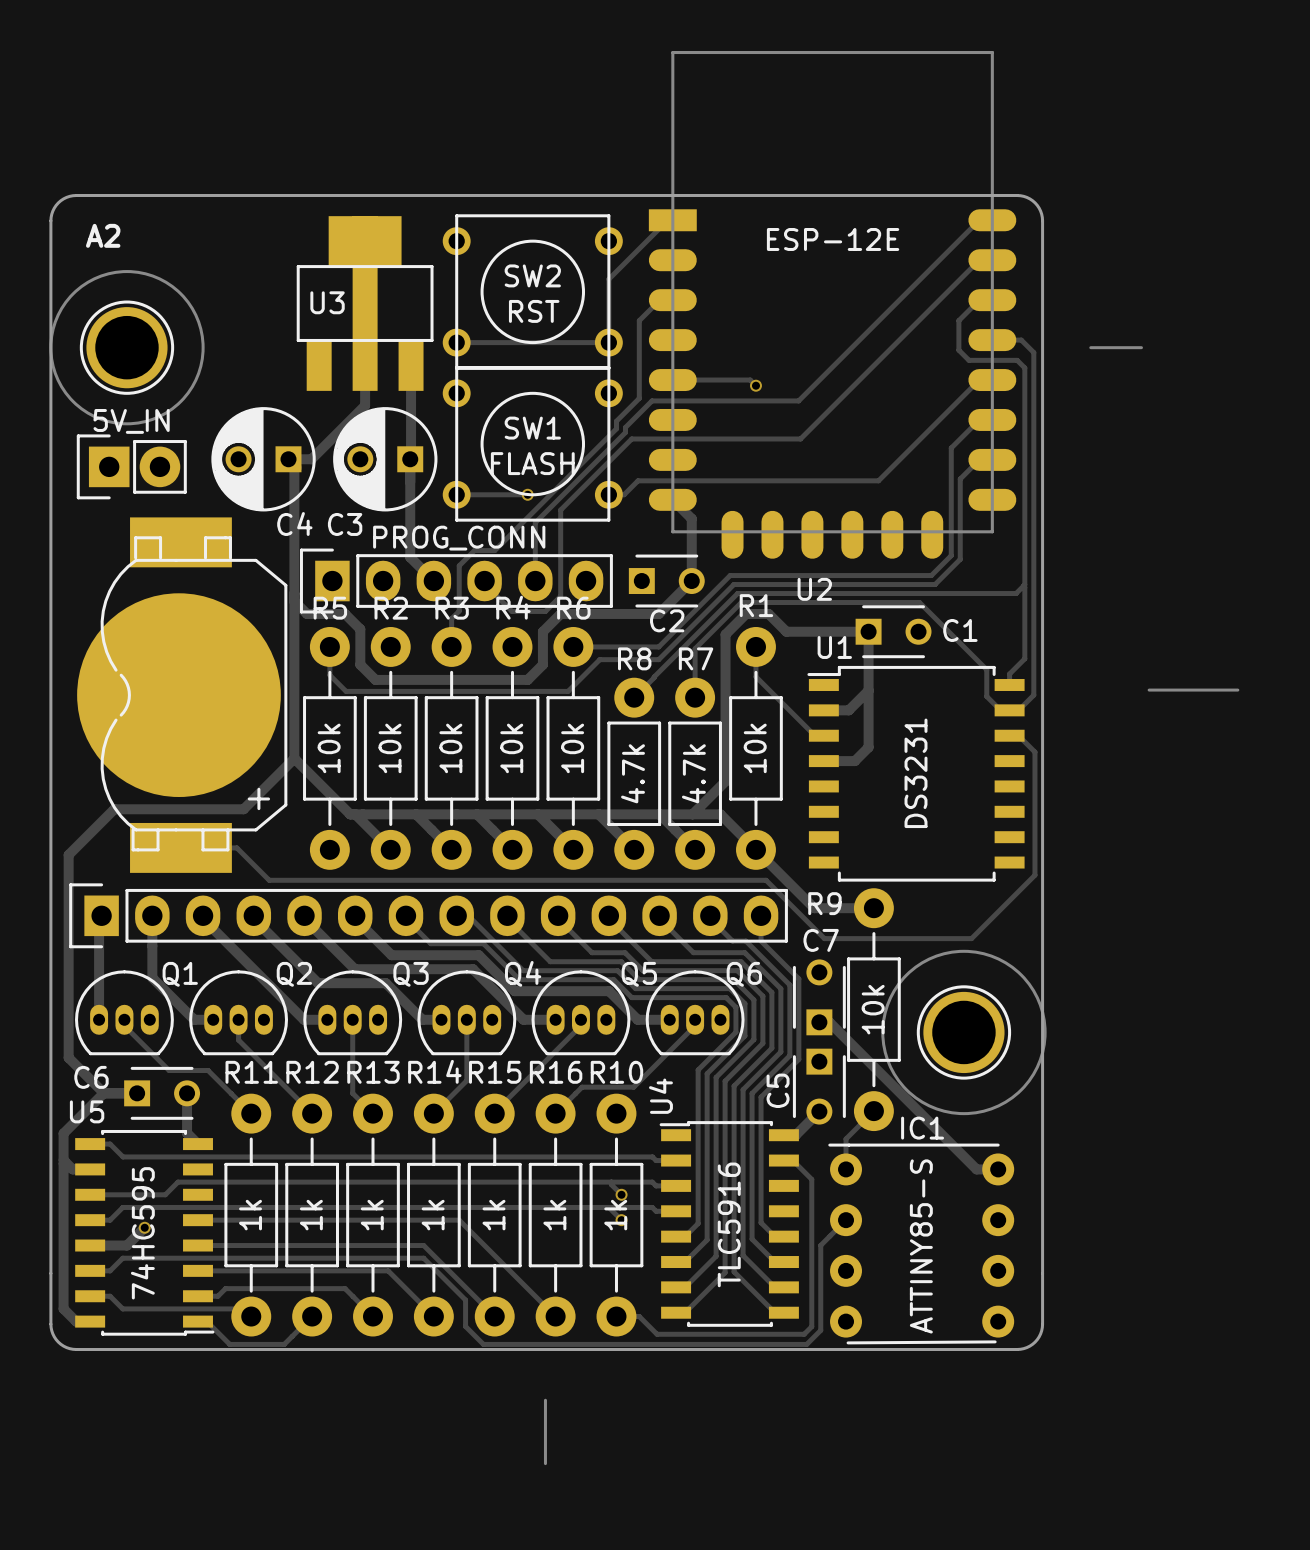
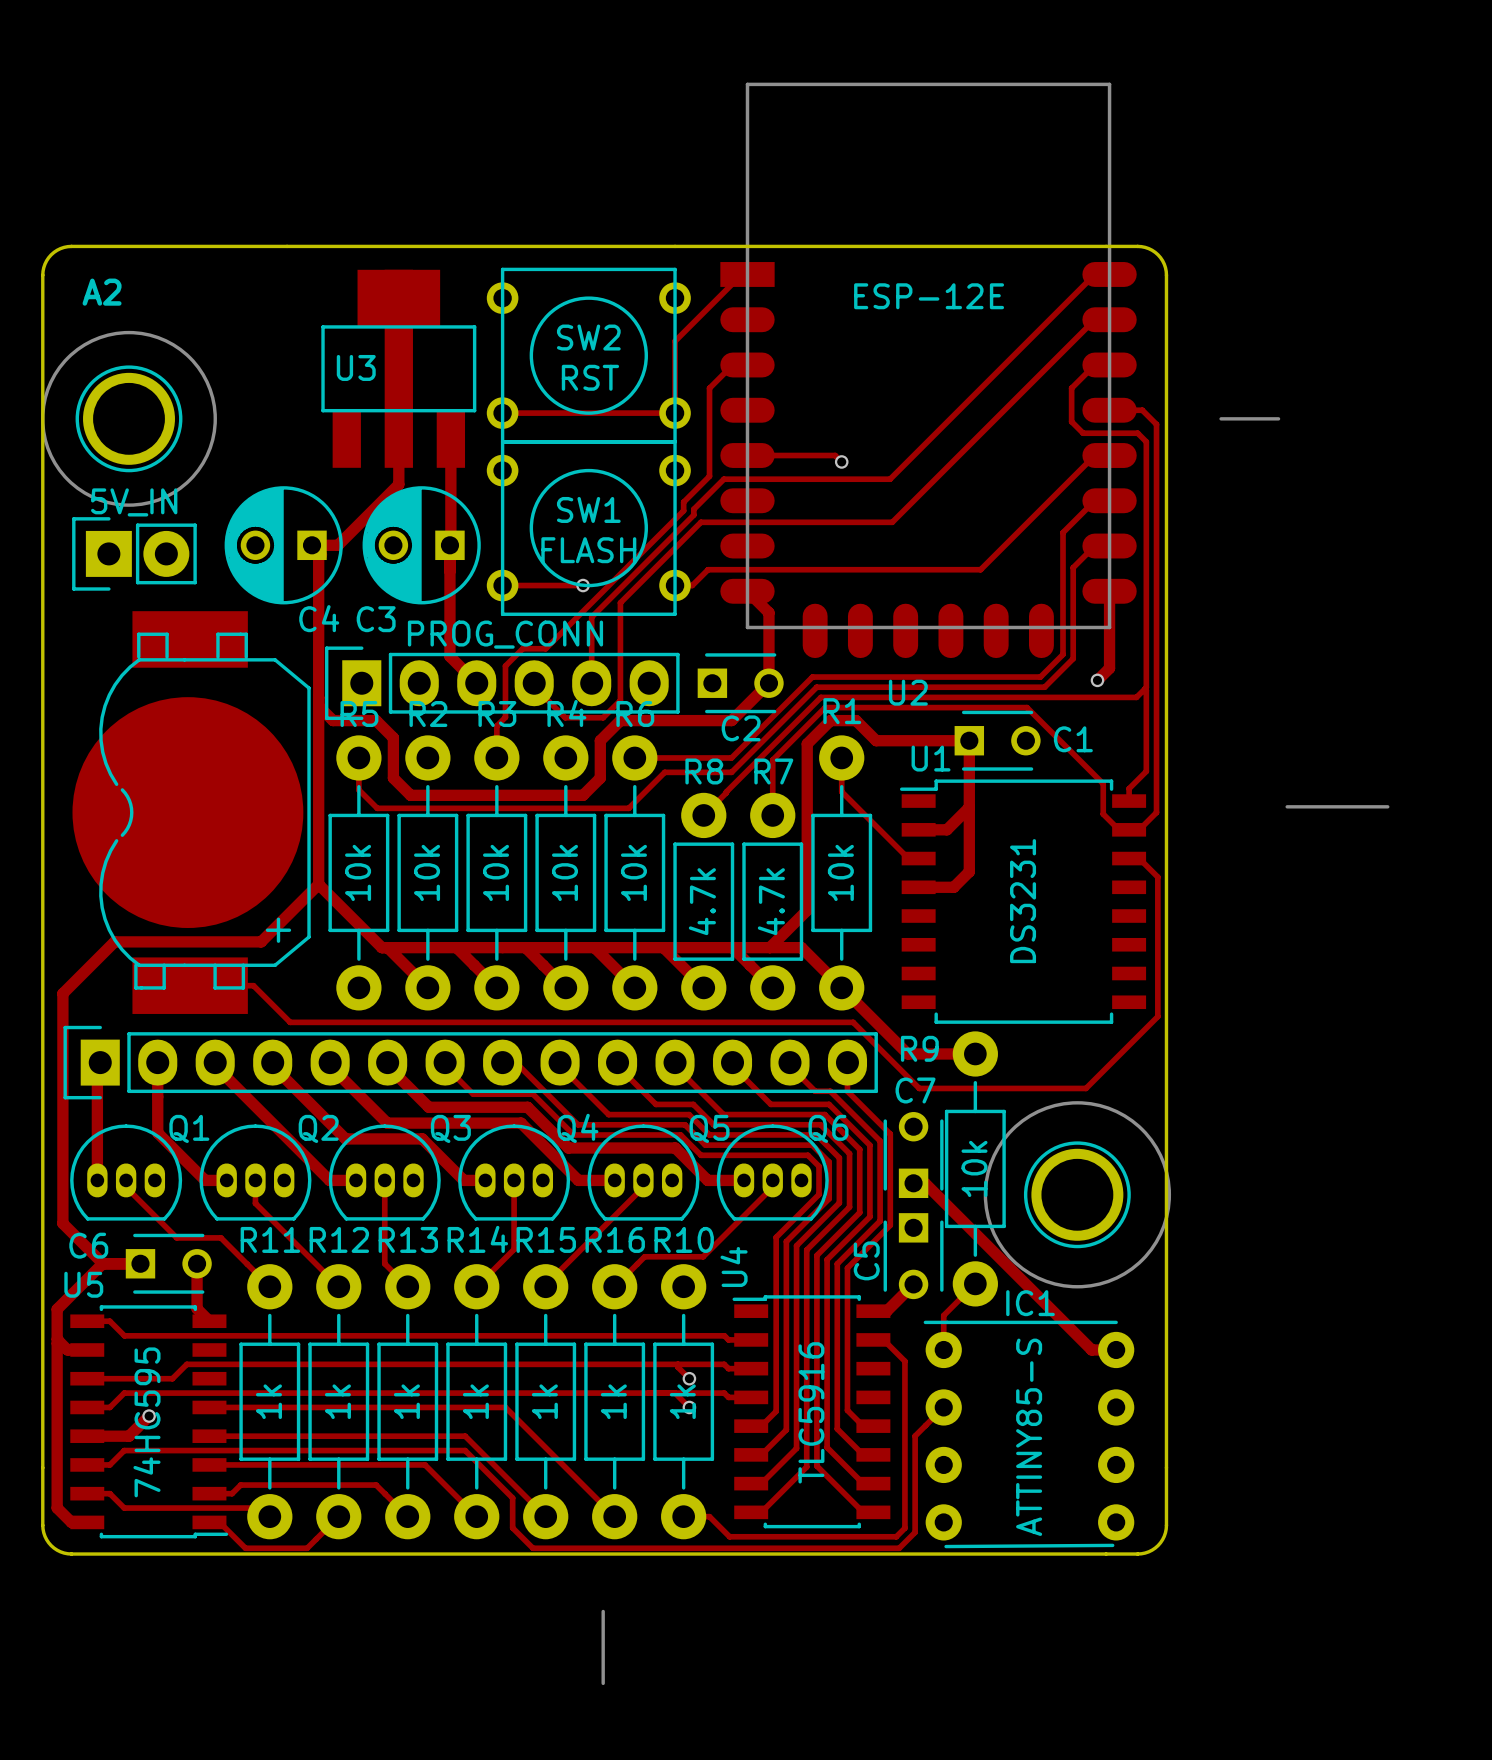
track: none -> (1109, 591) (1109, 668) (1097, 680)
via: none -> (1097, 680)

